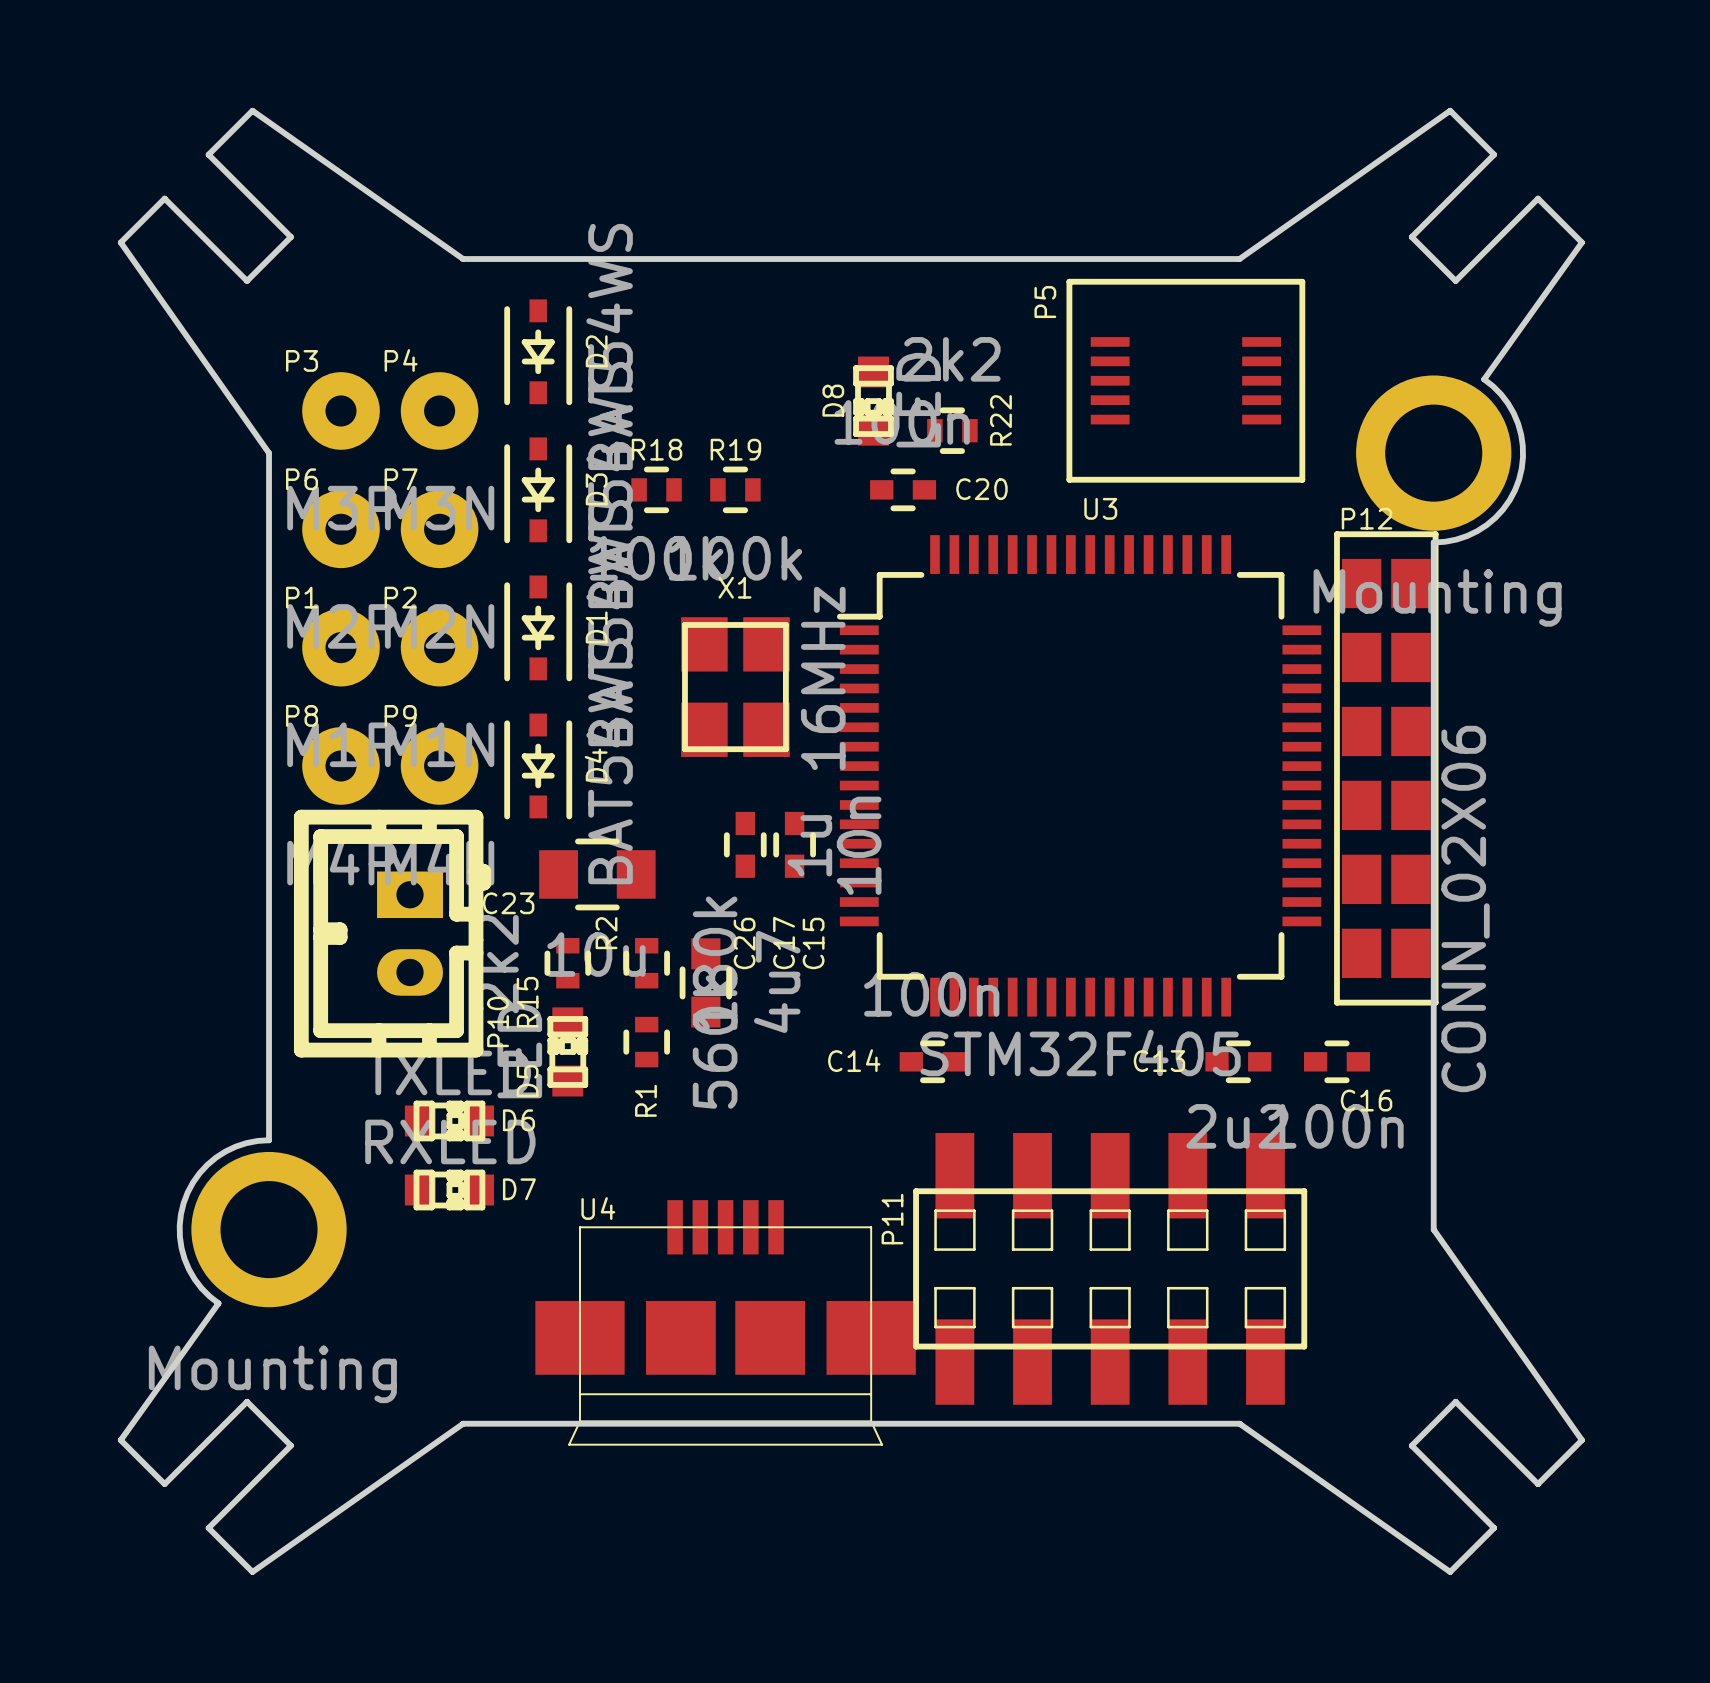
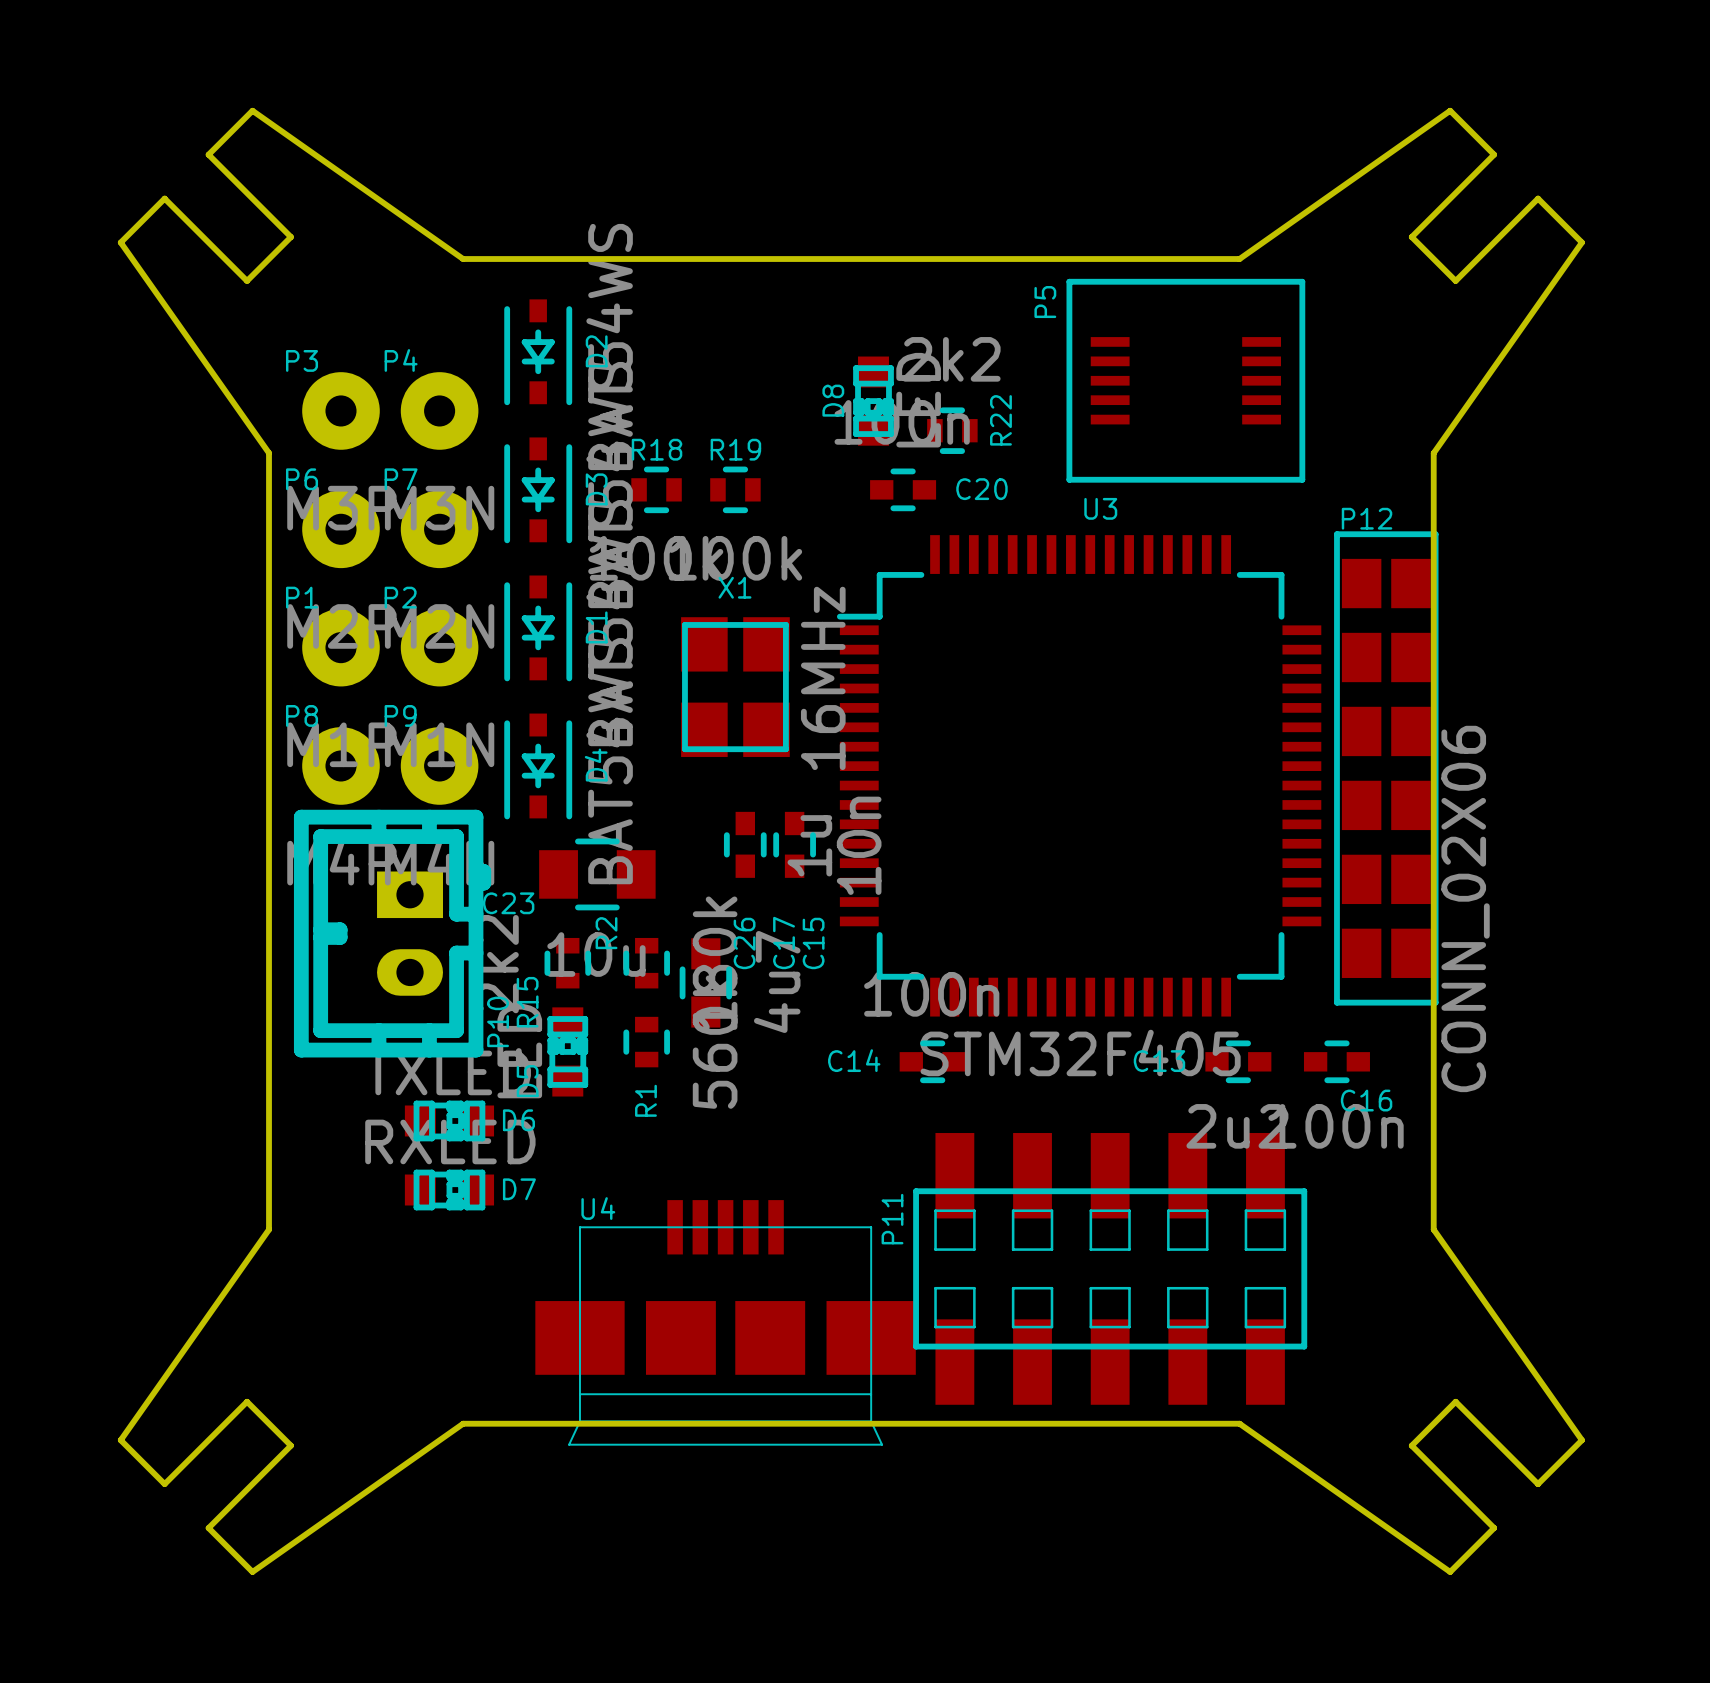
board edge: (1581, 242) (1484, 379) (1508, 403) (1521, 434) (1523, 457) (1515, 490) (1503, 509) (1477, 531) (1456, 539) (1433, 542) -> (1581, 242) (1433, 453) (1433, 542)
part: Mounting (1433, 453) -> none
board edge: (268, 1140) (246, 1143) (225, 1151) (207, 1164) (187, 1192) (179, 1225) (184, 1259) (194, 1279) (218, 1303) (120, 1440) -> (269, 1140) (269, 1229) (120, 1440)
part: Mounting (269, 1229) -> none

